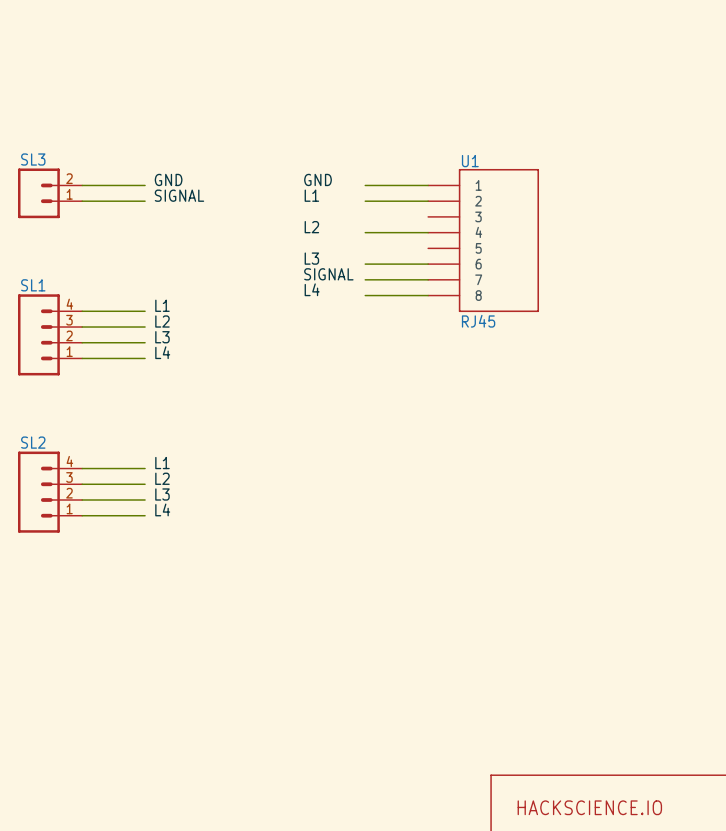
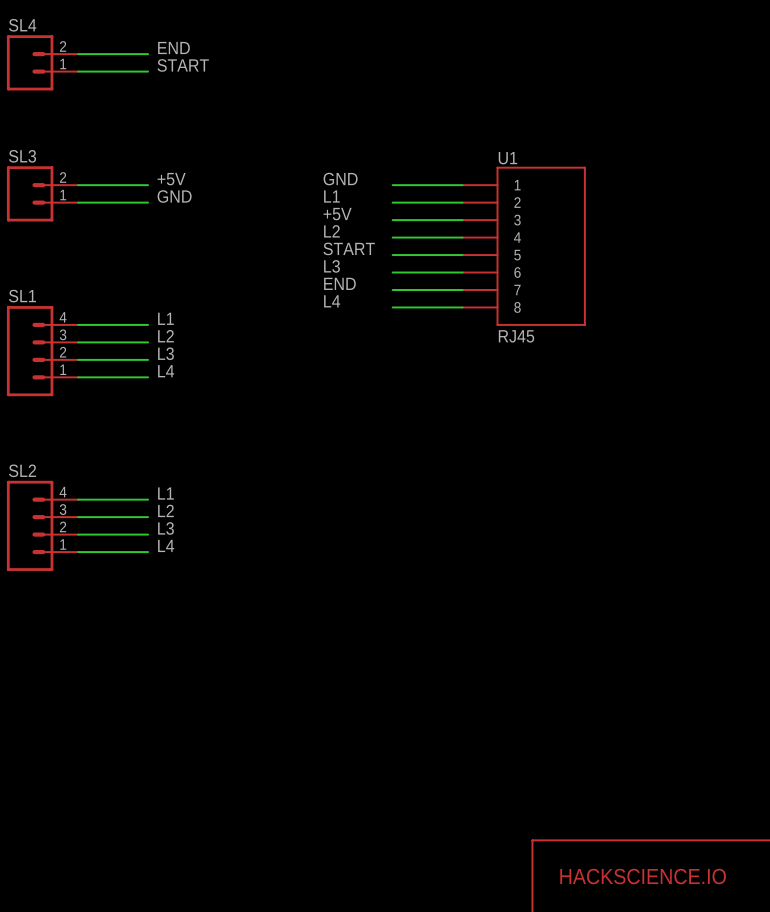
label: none -> END (173, 47)
wire: none -> (78, 54) (148, 54)
SL4: none -> (42, 62)
label: none -> START (183, 65)
wire: none -> (78, 71) (148, 71)
label: GND (168, 179) -> +5V (171, 179)
label: SIGNAL (179, 195) -> GND (174, 196)
label: none -> +5V (337, 214)
wire: none -> (392, 220) (462, 220)
label: none -> START (349, 248)
wire: none -> (392, 255) (462, 255)
label: SIGNAL (328, 274) -> END (339, 283)

